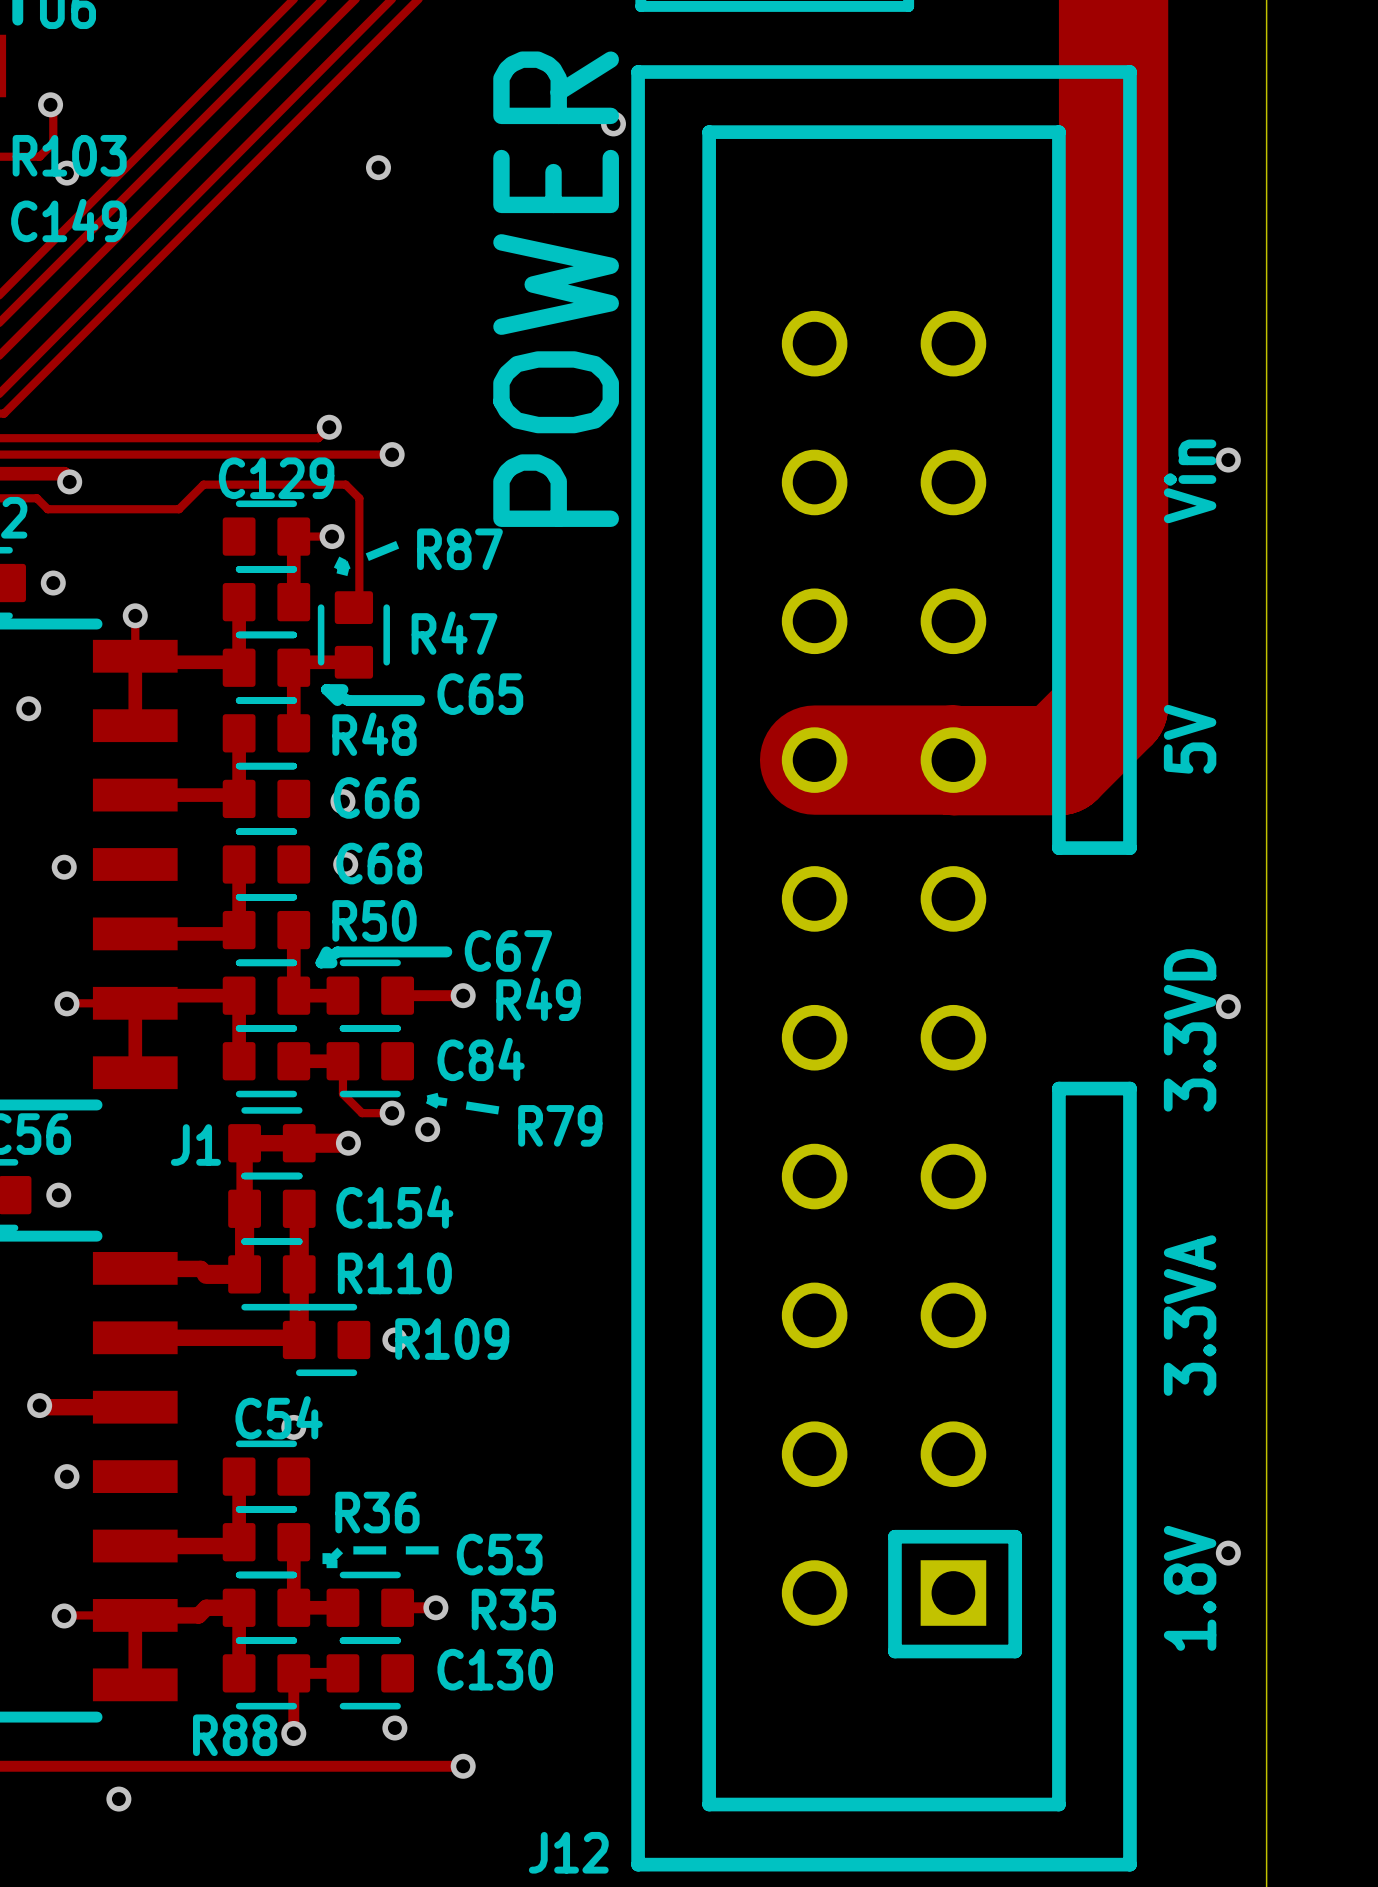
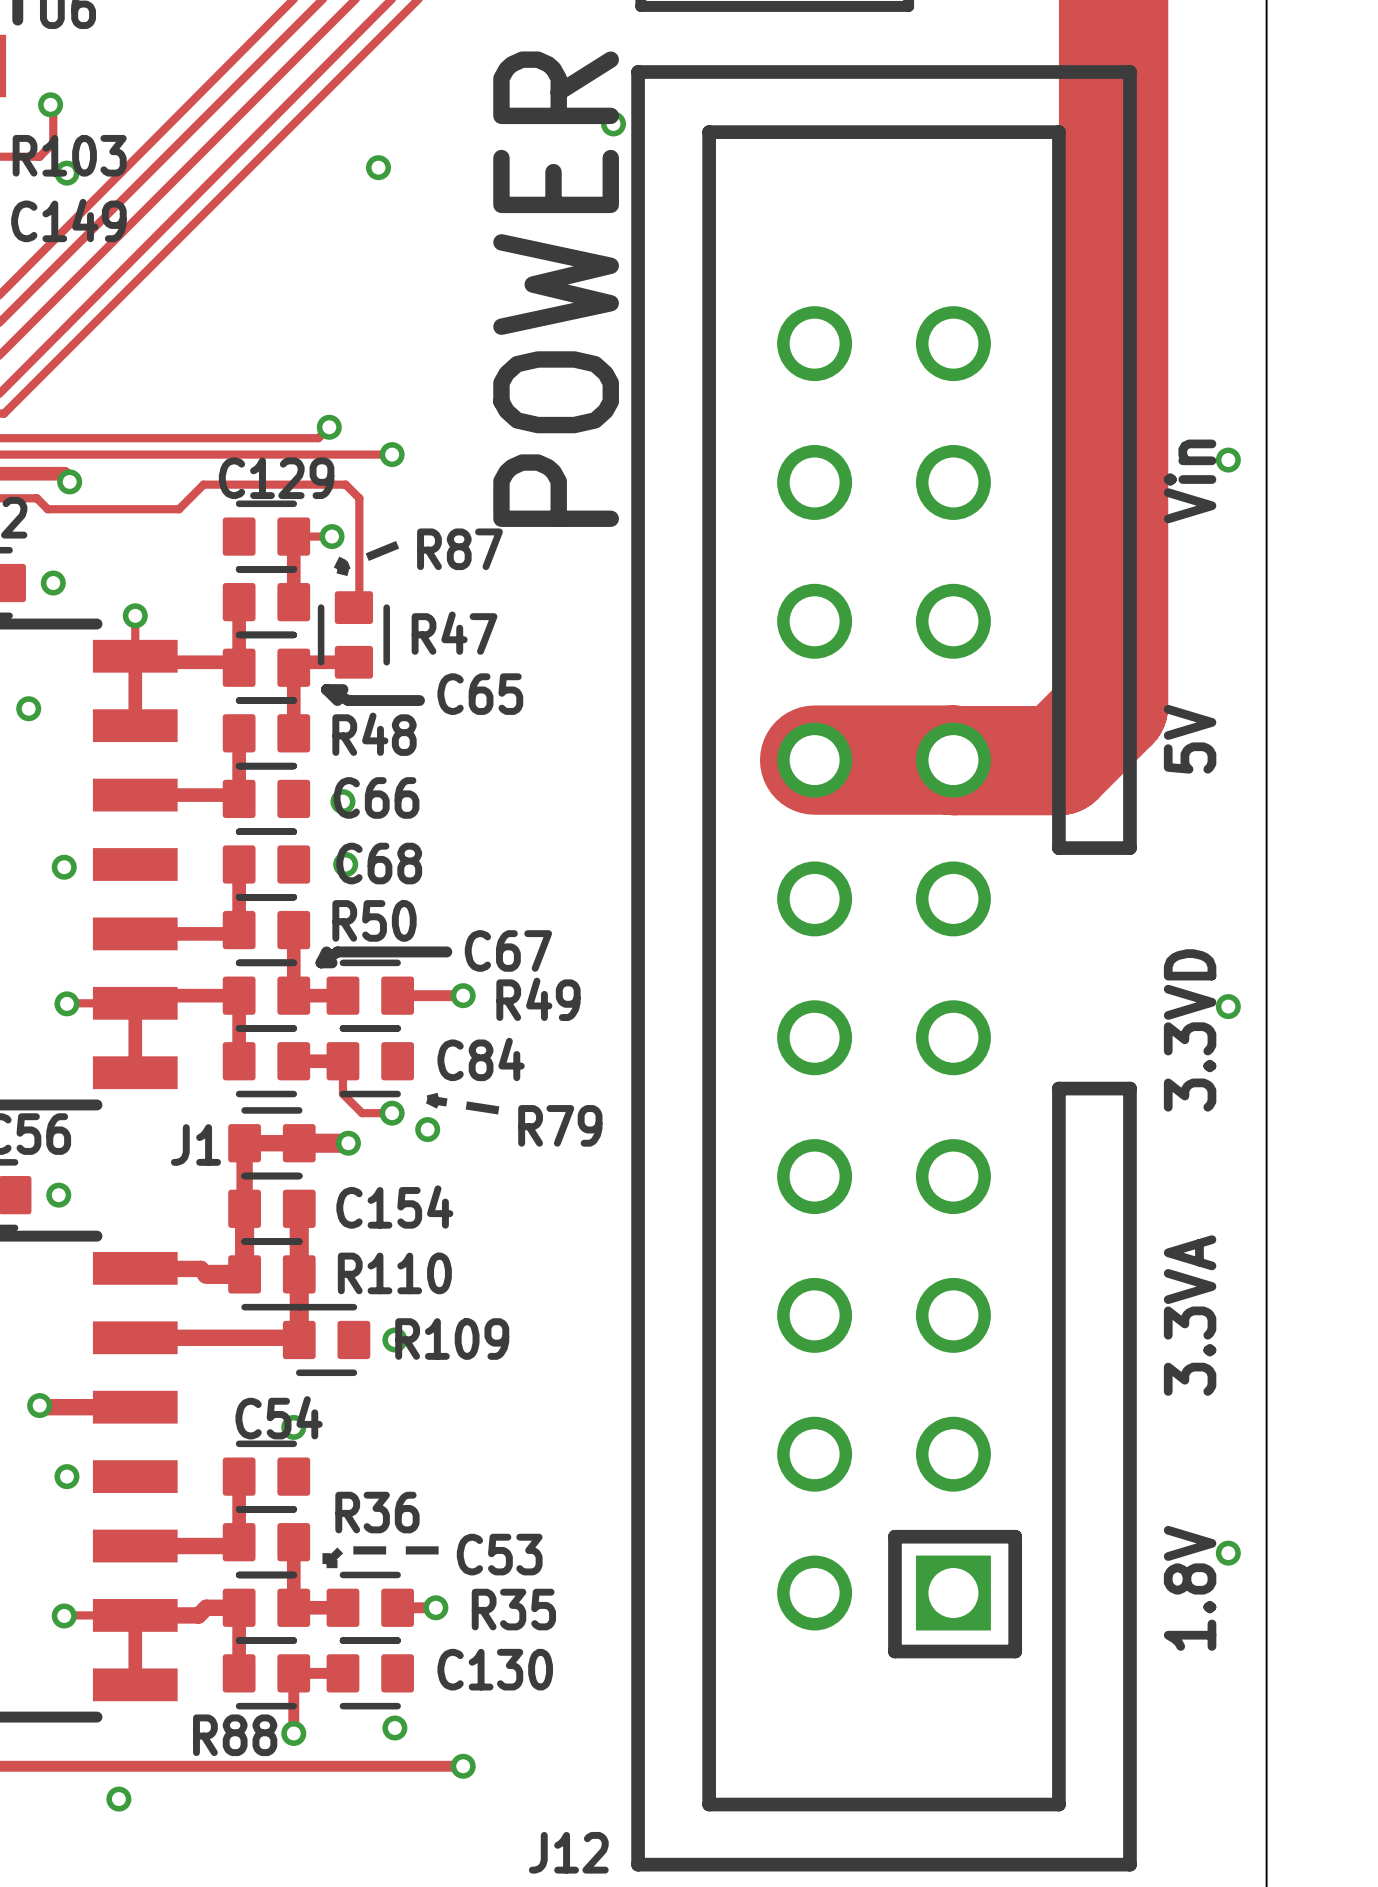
J12 footprint: [631, 65, 1137, 1872] -> [631, 65, 1137, 1872]

